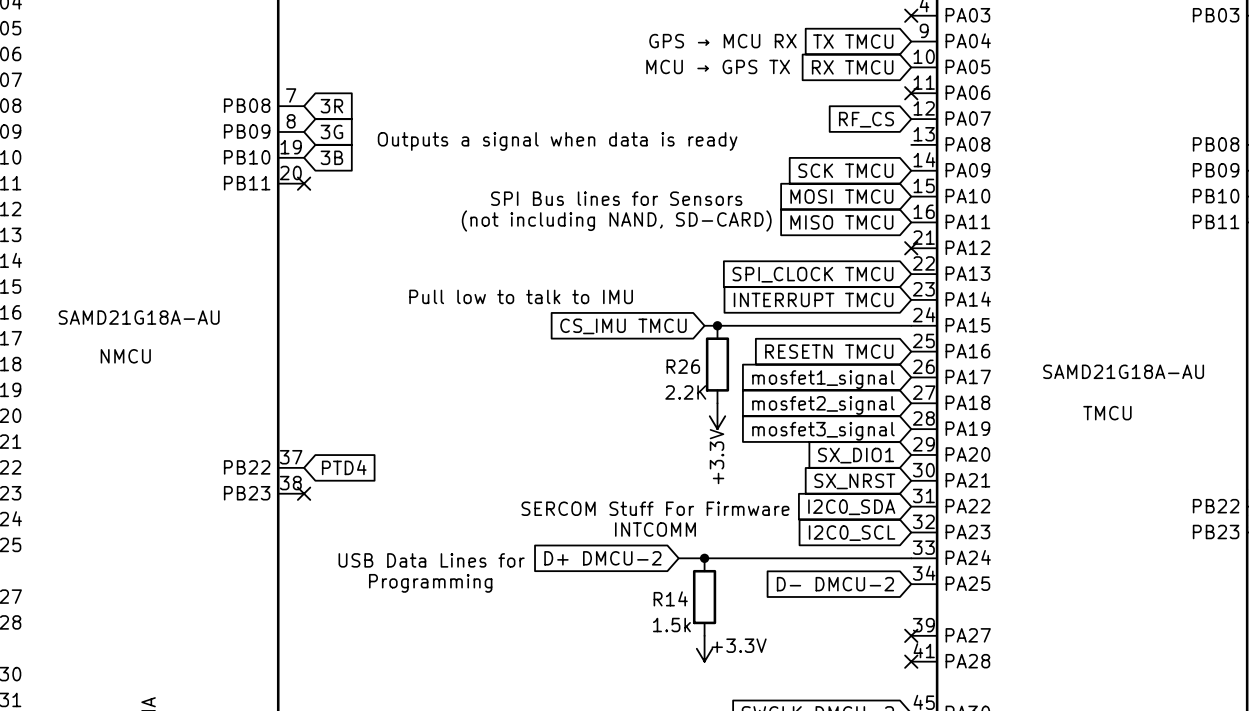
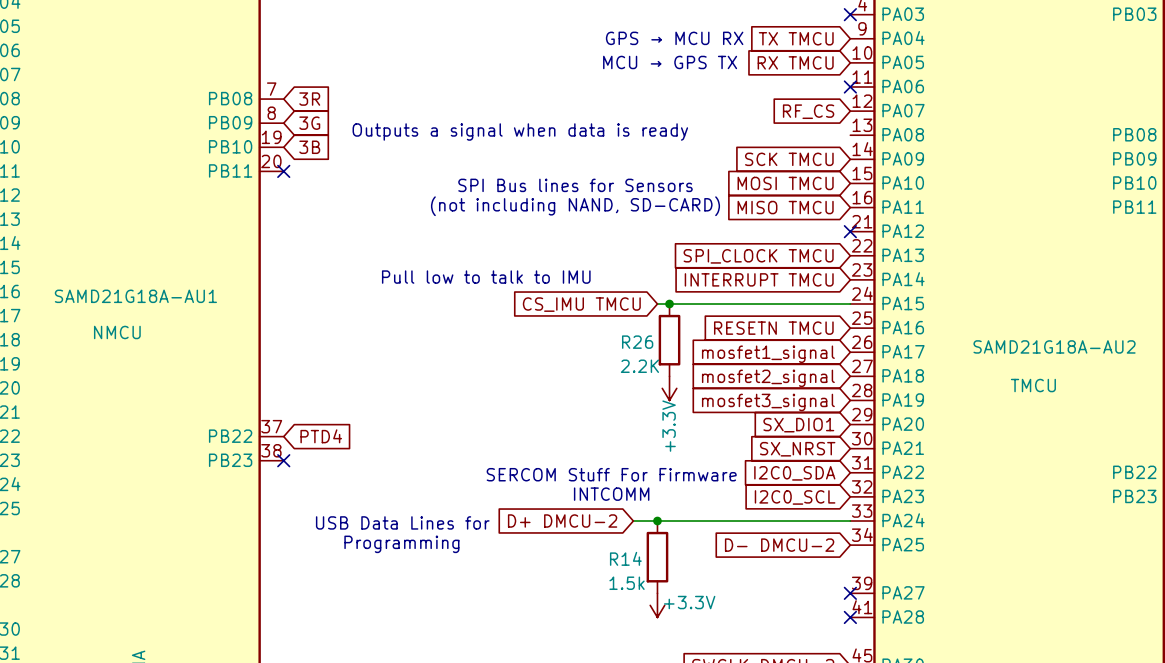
SAMD21G18A-AU name: SAMD21G18A-AU (139, 317) -> SAMD21G18A-AU1 (135, 296)
SAMD21G18A-AU name: SAMD21G18A-AU (1123, 371) -> SAMD21G18A-AU2 (1054, 346)

